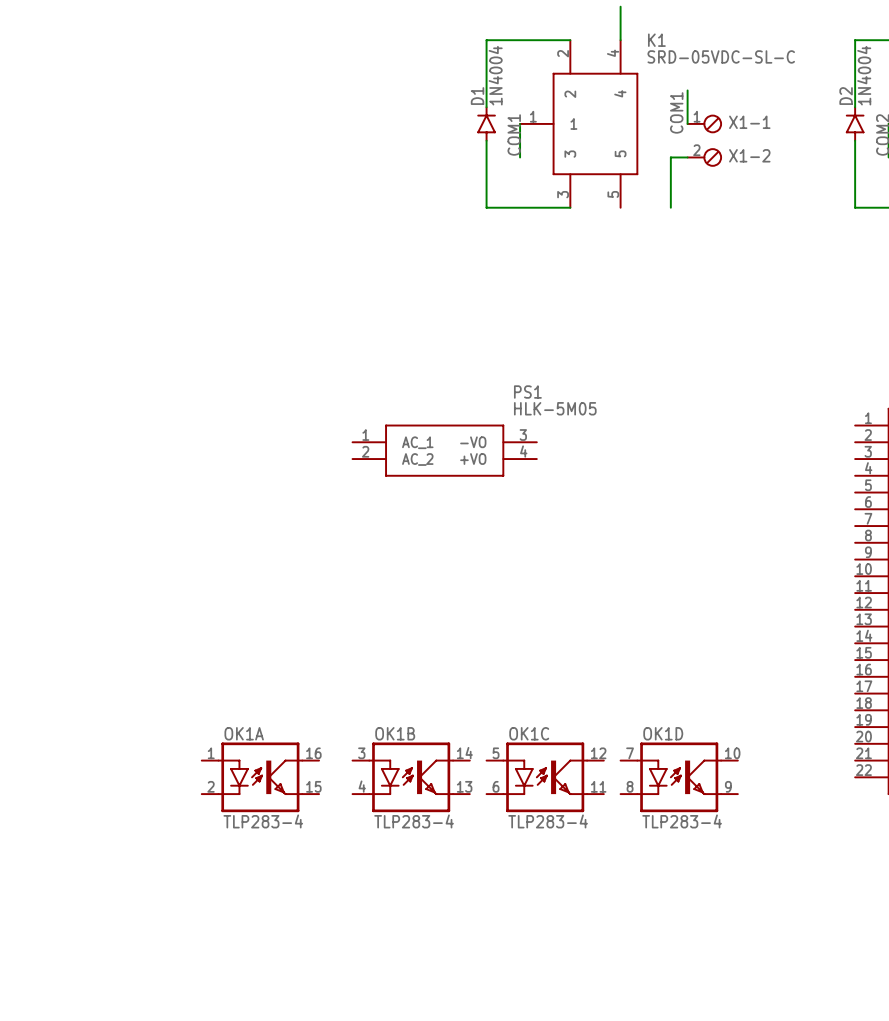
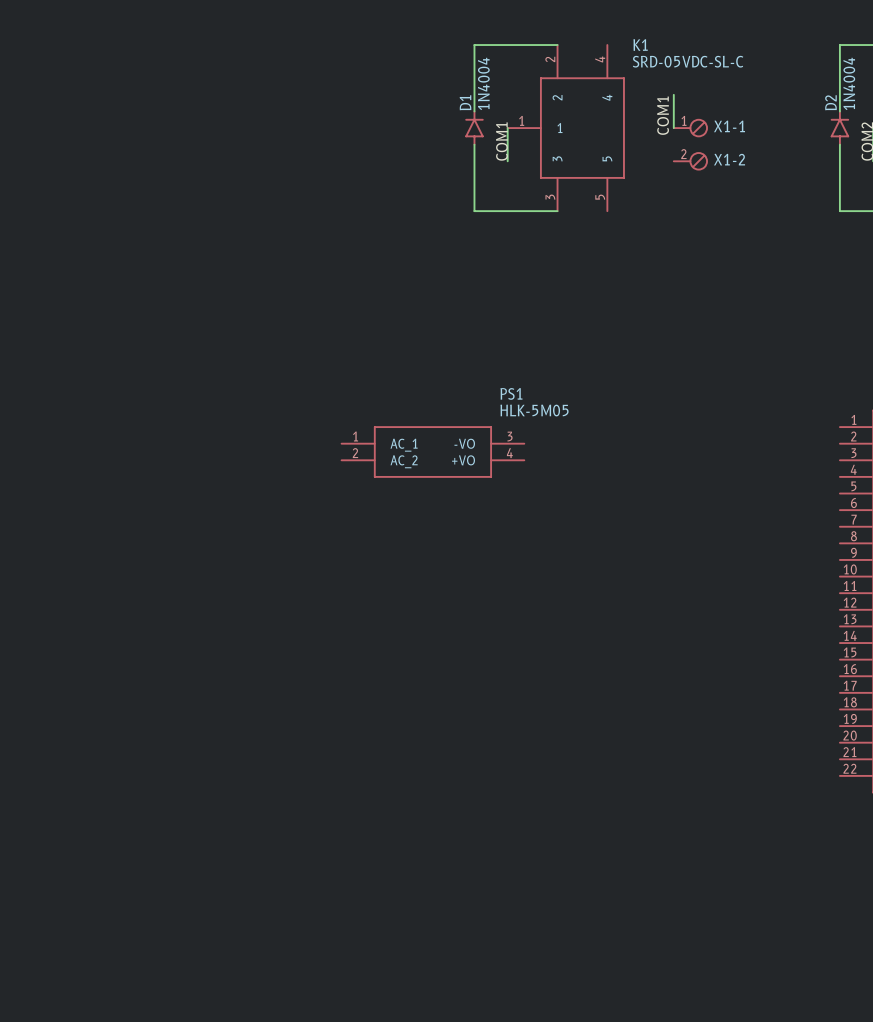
wire: (620, 6) (620, 40) -> none
wire: (687, 157) (670, 157) (670, 207) -> none
OK1A: TLP283-4 (260, 777) -> none
OK1B: TLP283-4 (411, 777) -> none
OK1C: TLP283-4 (545, 777) -> none
OK1D: TLP283-4 (679, 777) -> none

